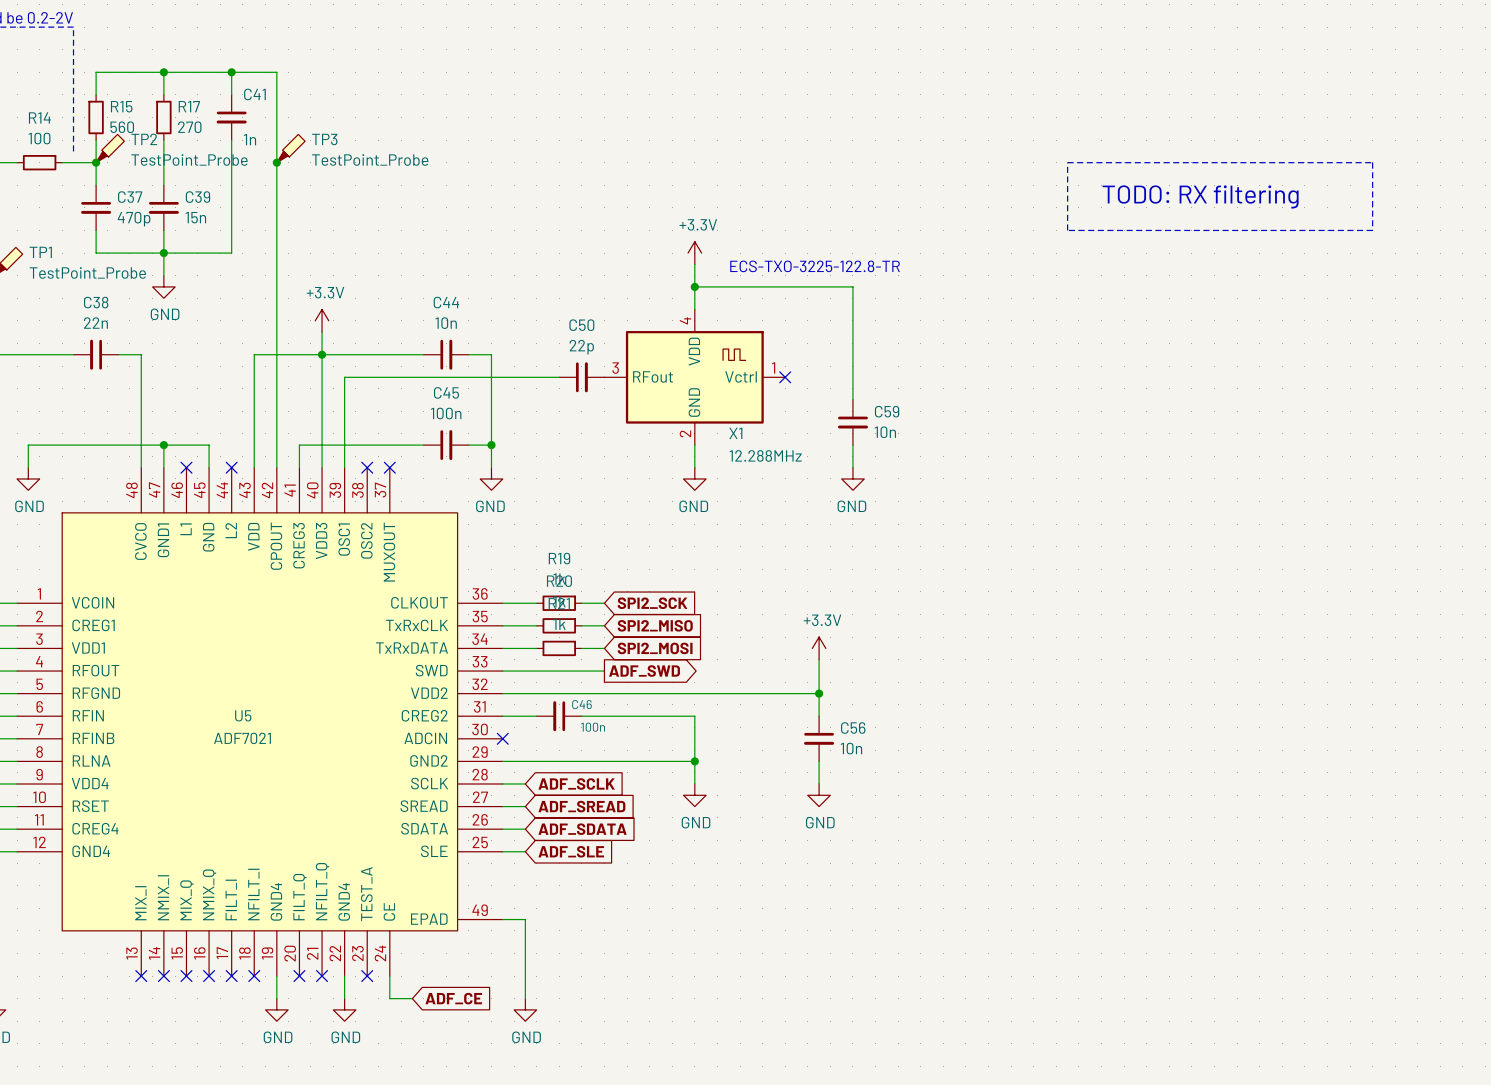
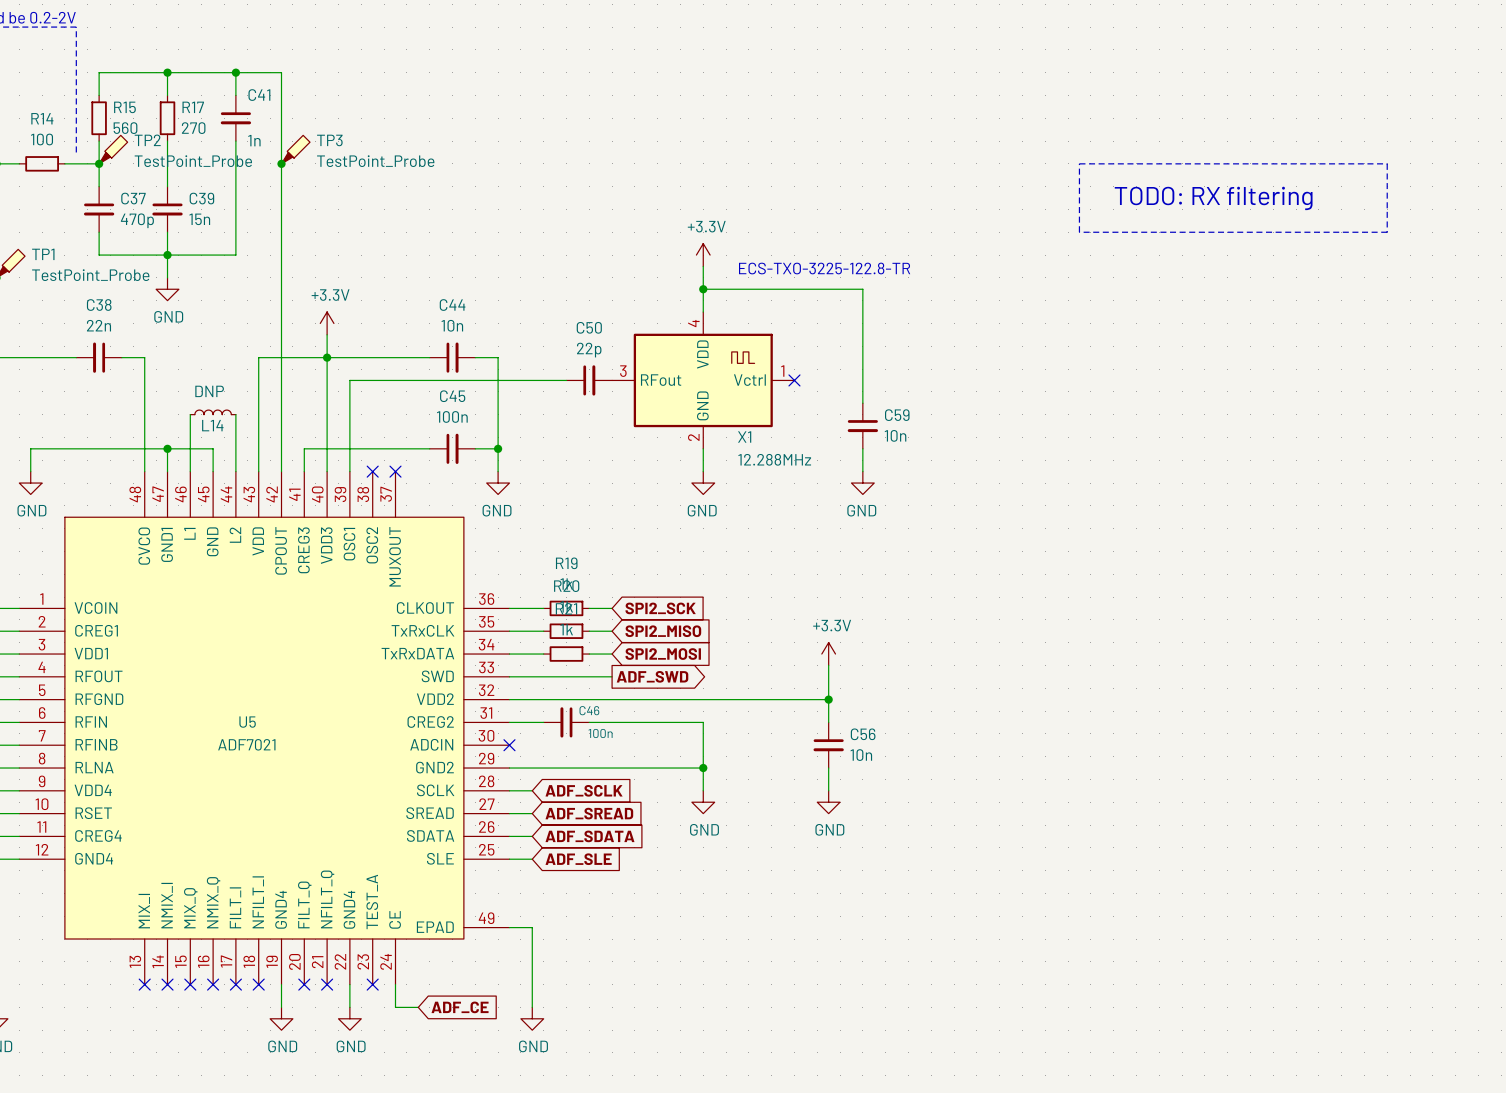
L14: none -> DNP (213, 412)
wire: none -> (190, 414) (190, 471)
wire: none -> (235, 414) (235, 471)
no-connect mark: (186, 467) -> none
no-connect mark: (231, 467) -> none

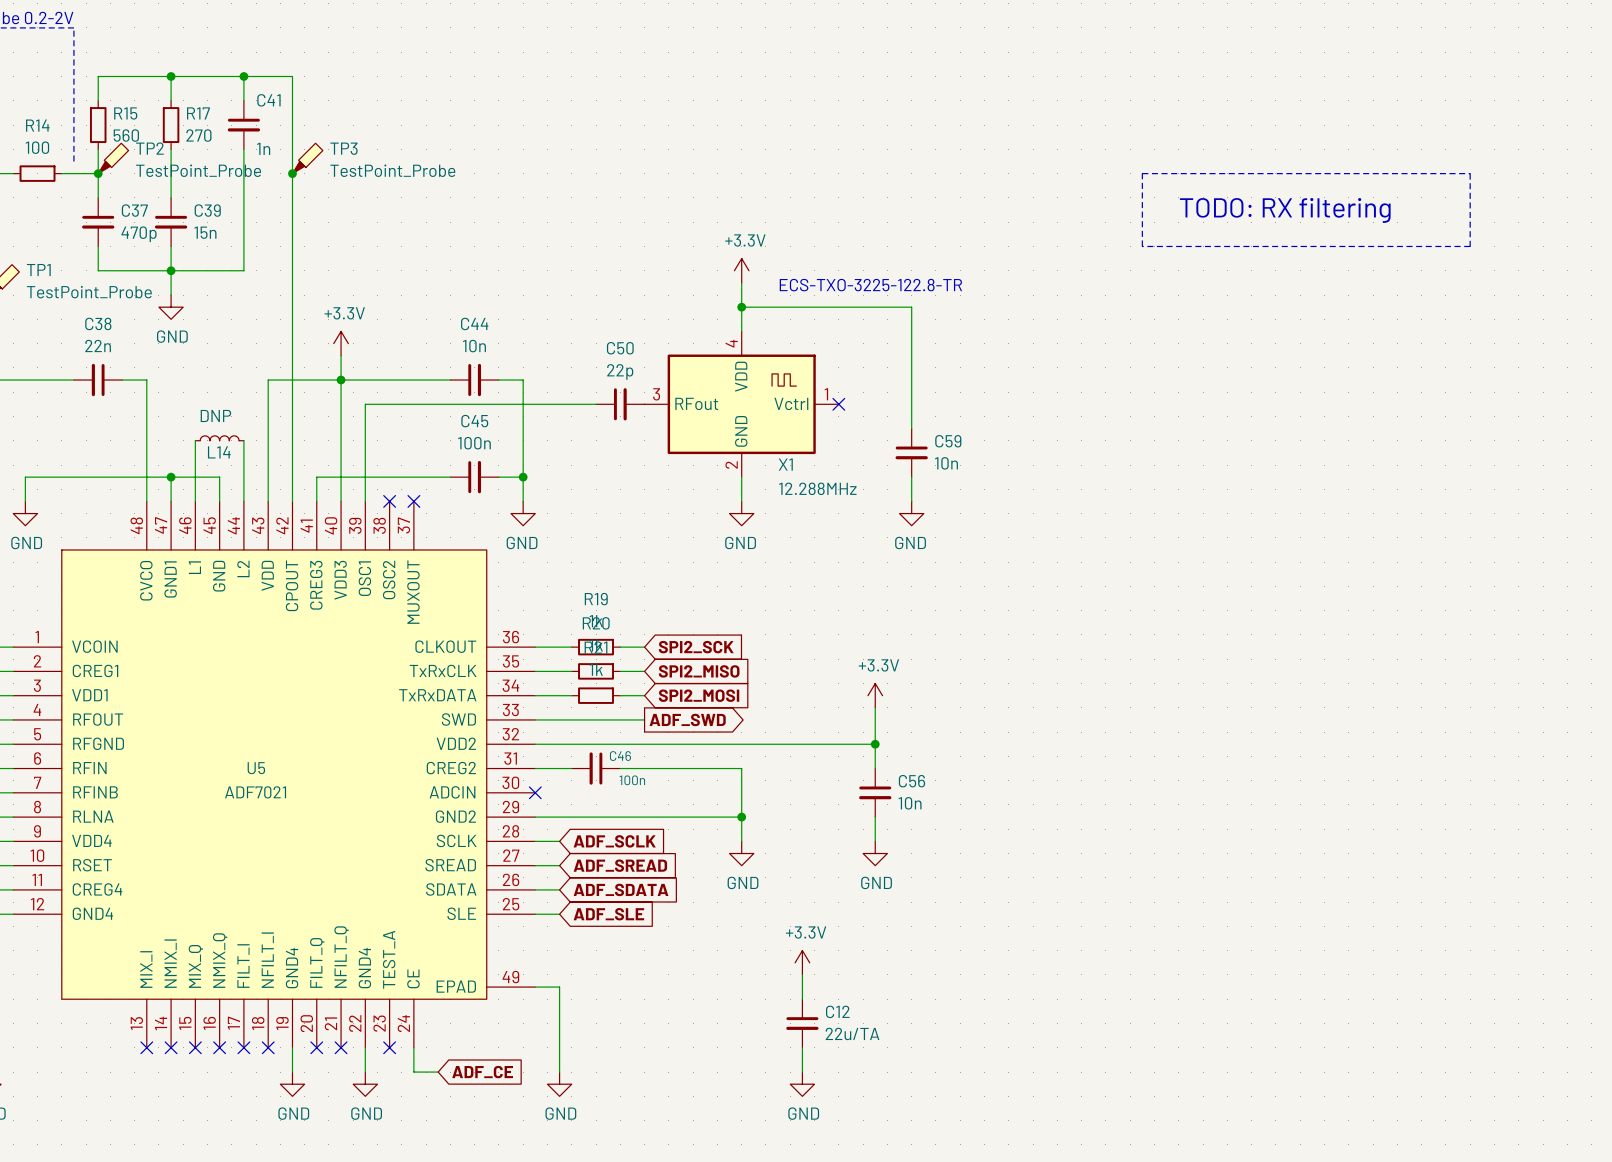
power symbol: none -> +3.3V (802, 962)
wire: none -> (802, 974) (802, 999)
C12: none -> 22u/TA (802, 1023)
wire: none -> (802, 1047) (802, 1072)
power symbol: none -> GND (802, 1084)

